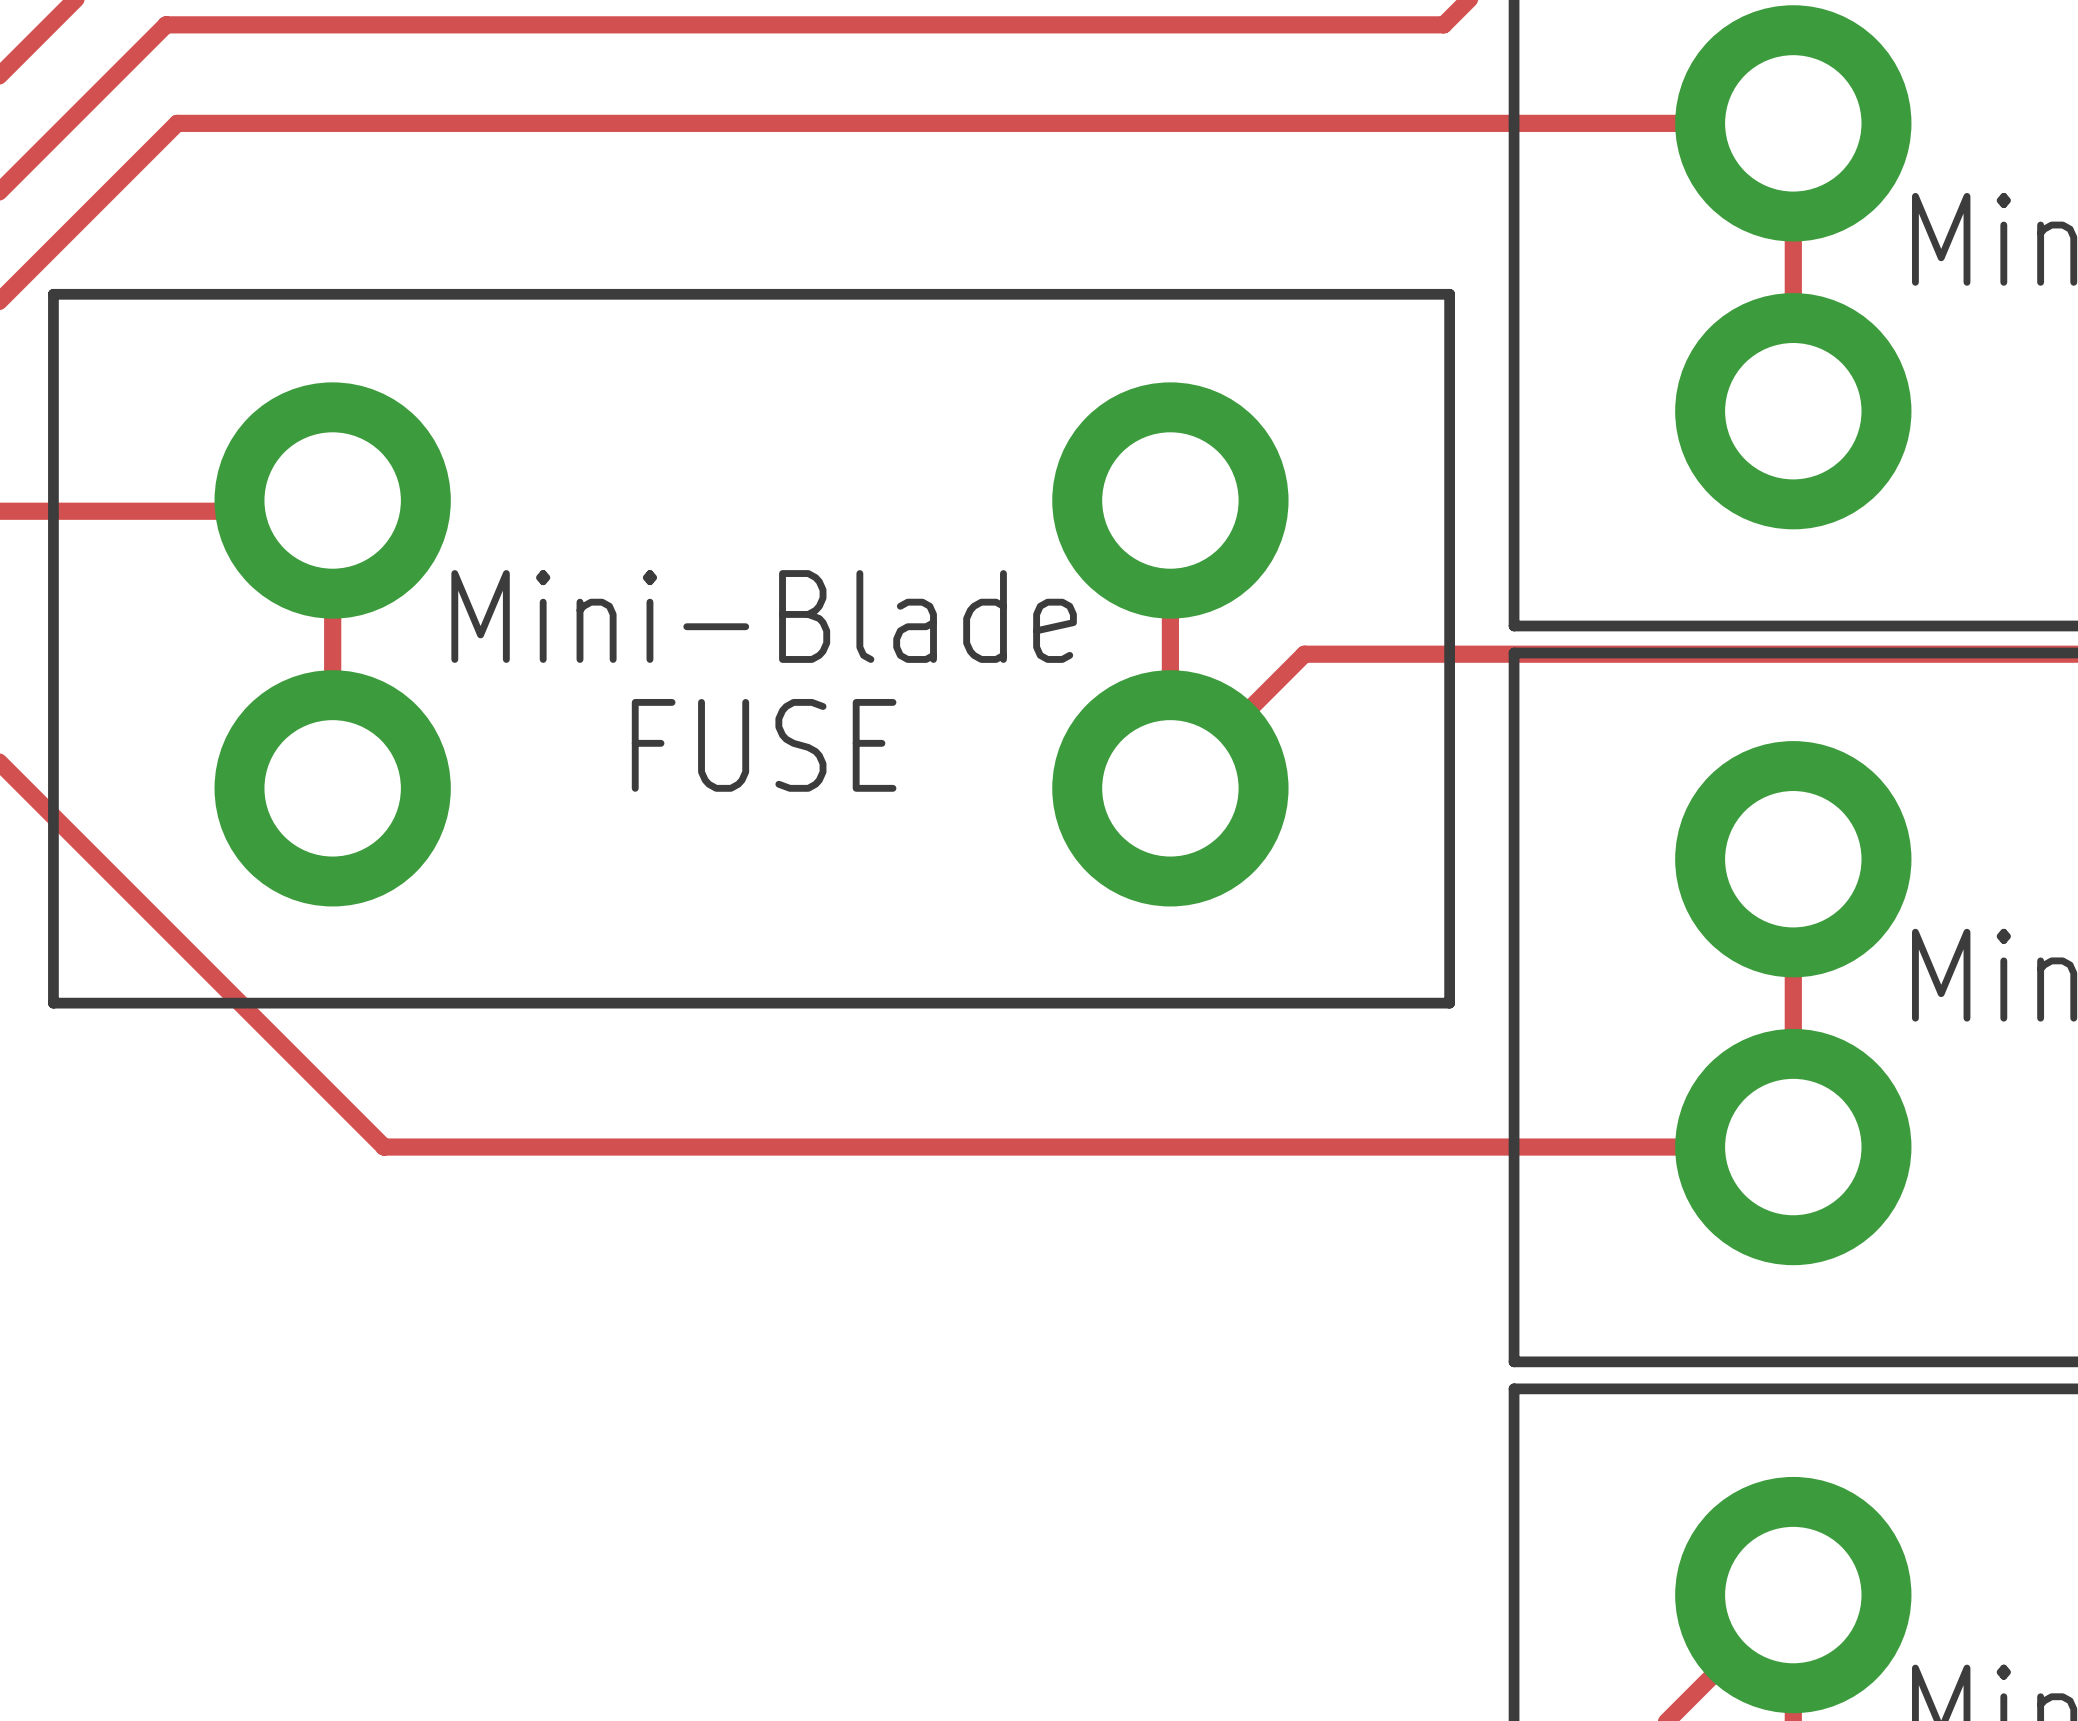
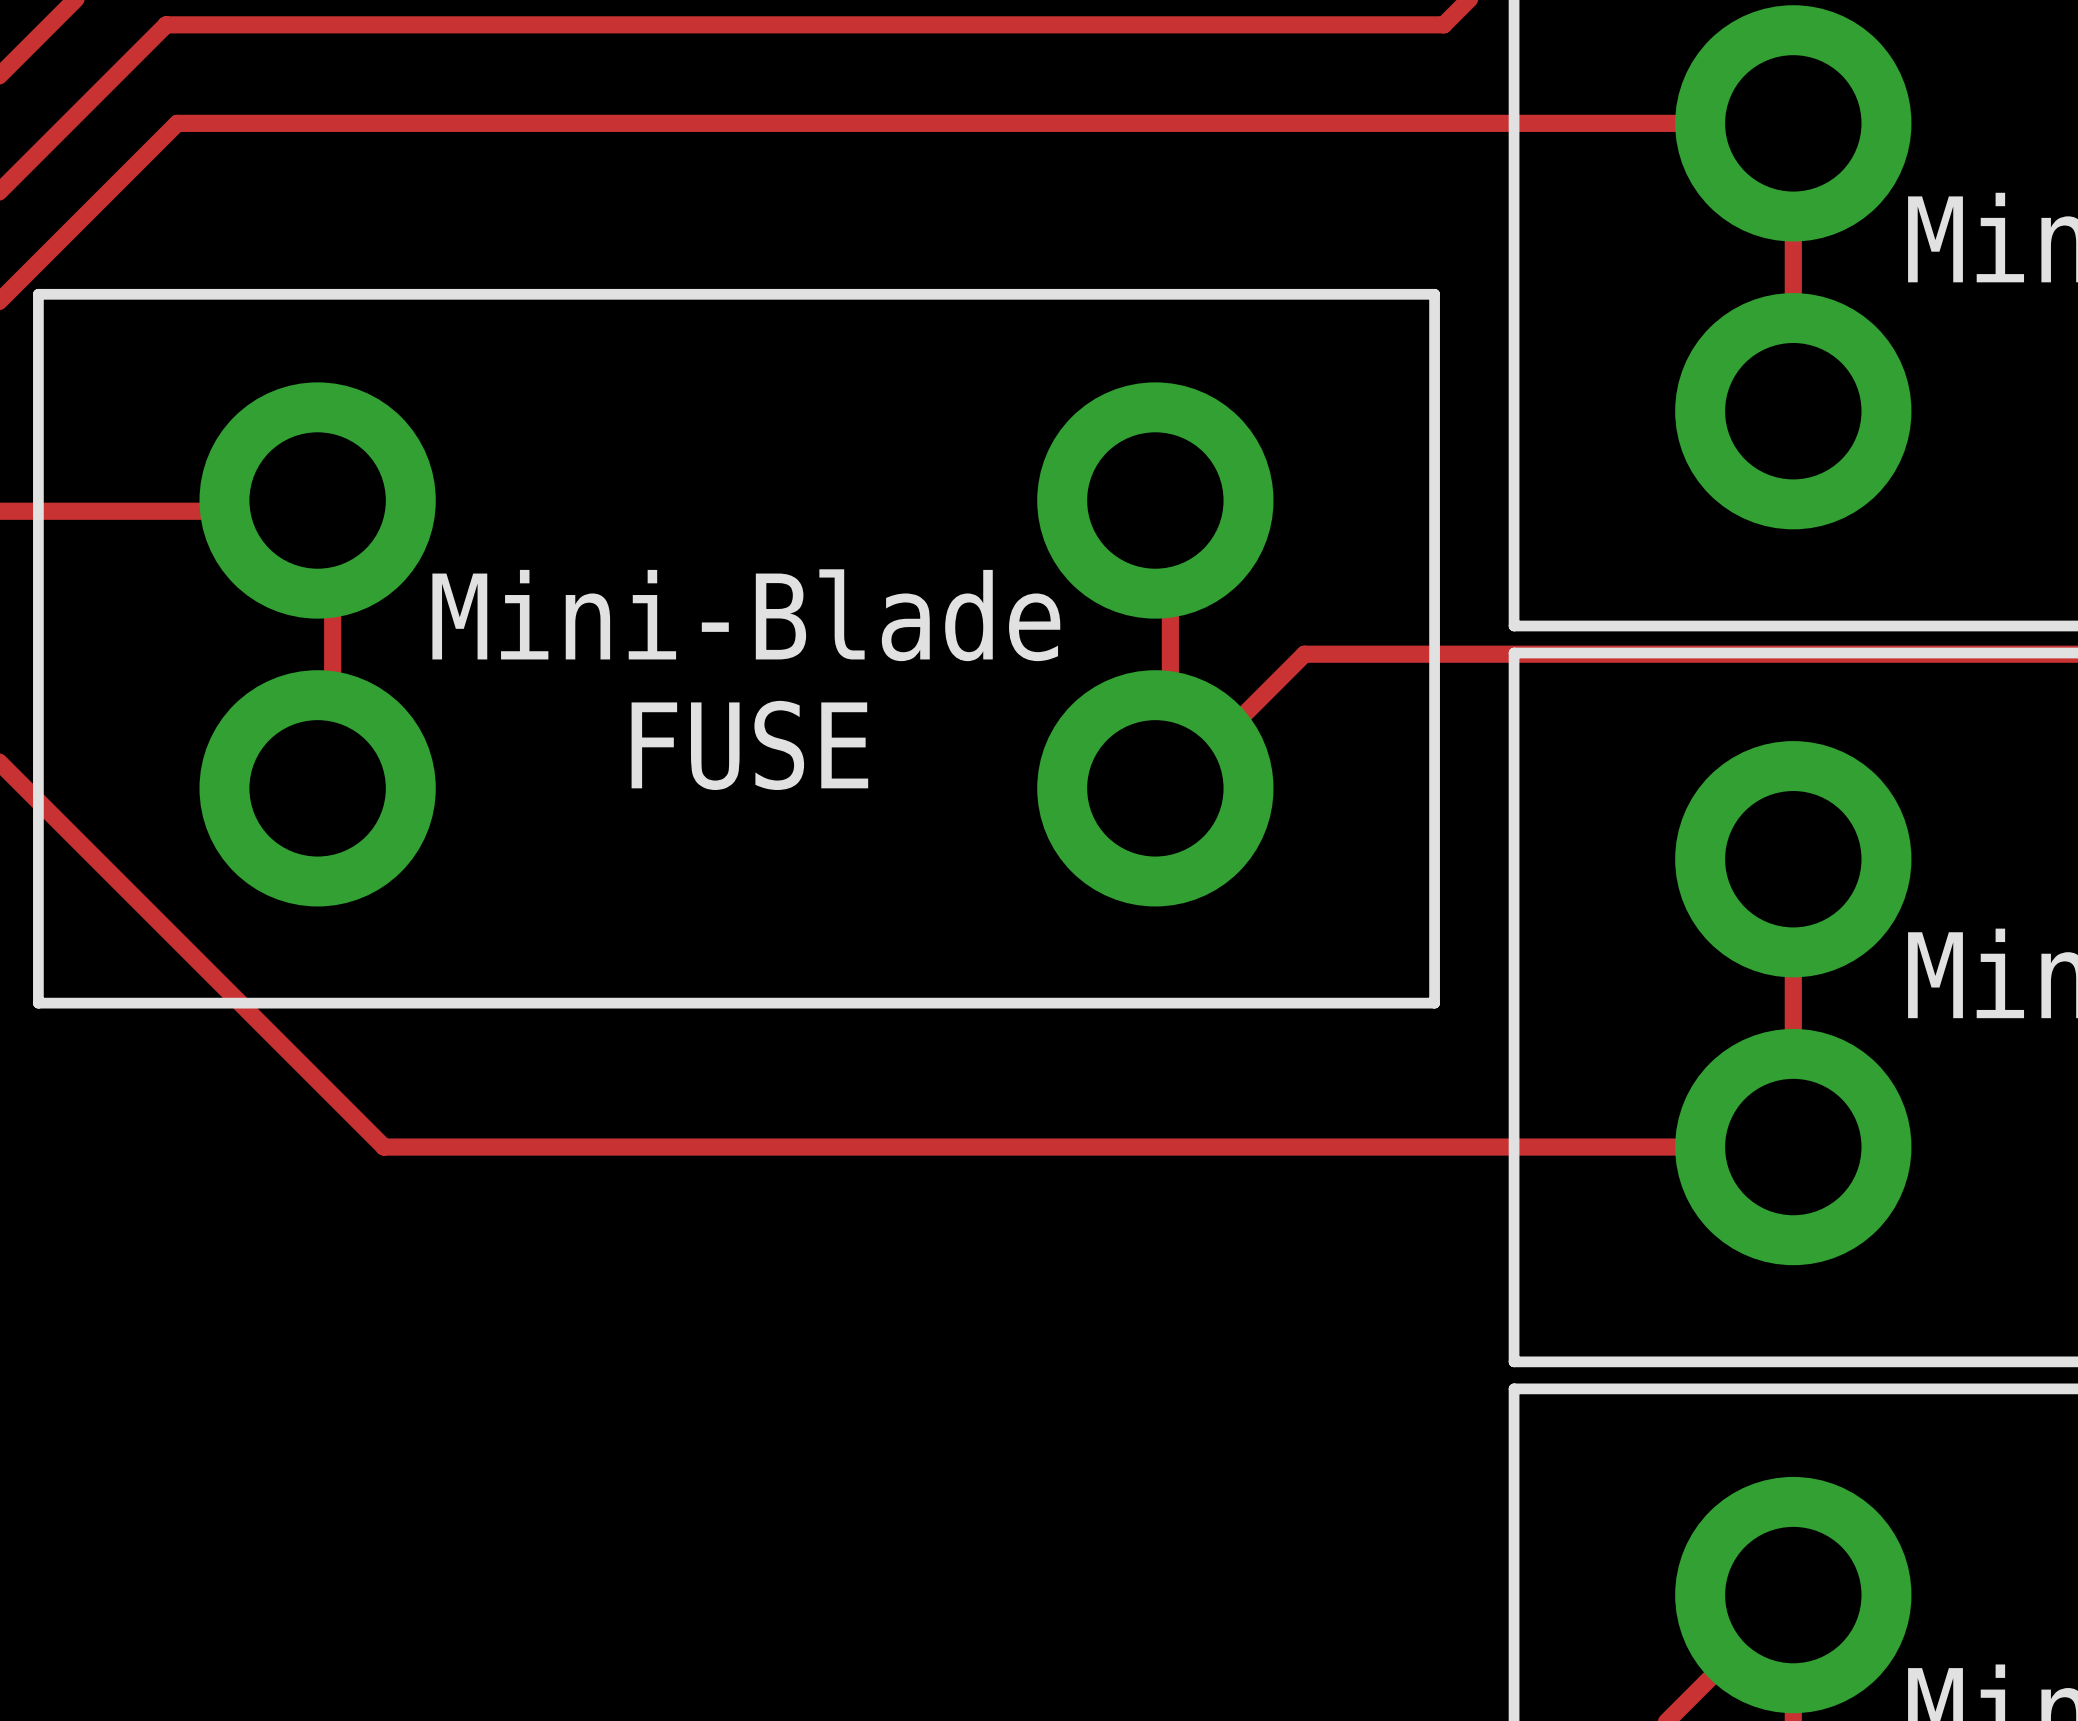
part position: (751, 648) -> (736, 648)

